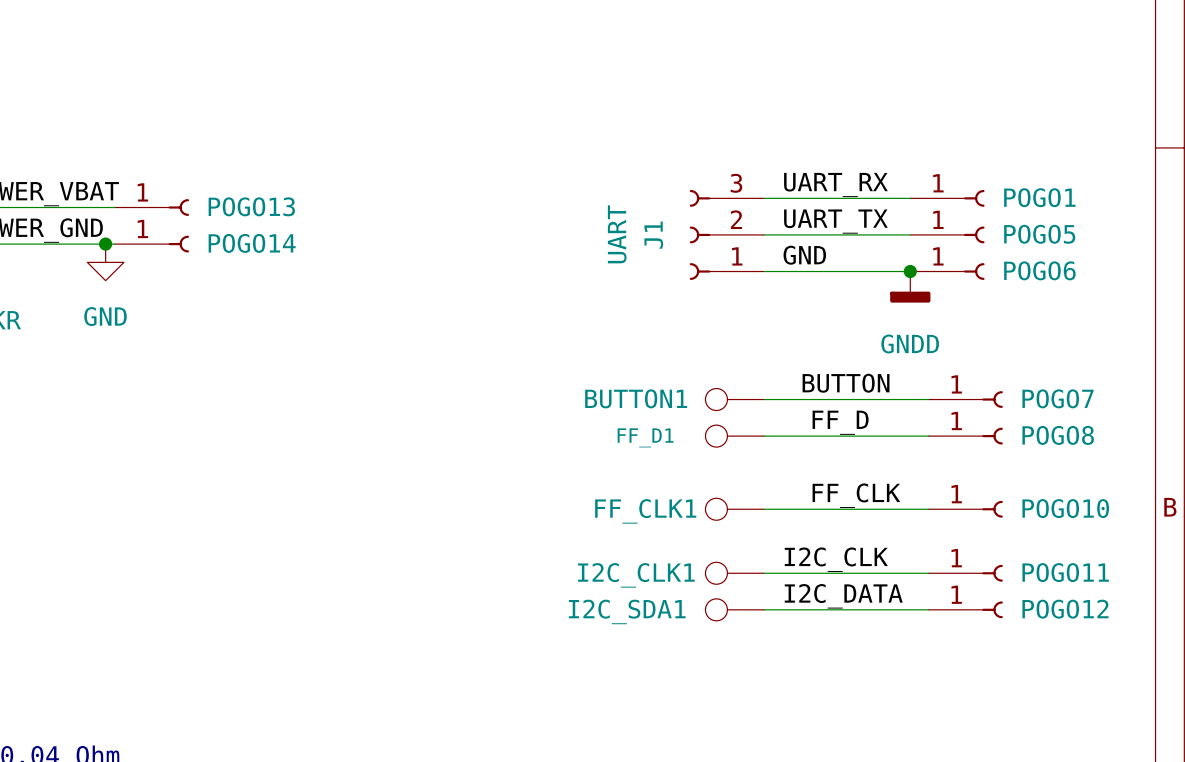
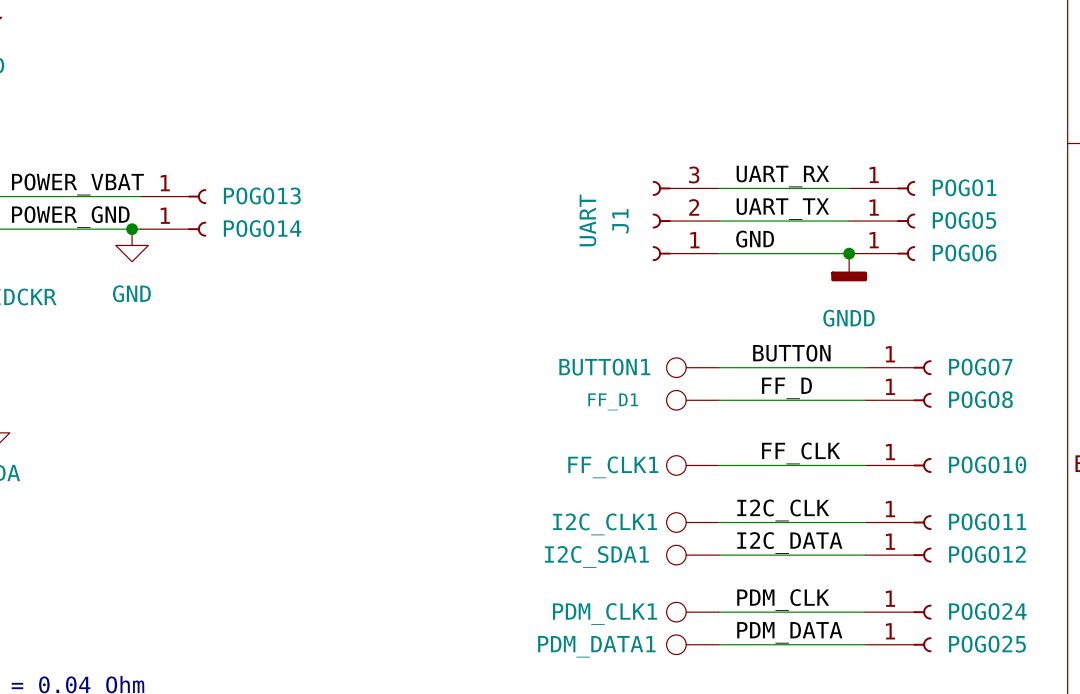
label: none -> PDM_CLK (783, 600)
PDM_CLK1: none -> (692, 612)
wire: none -> (718, 612) (865, 612)
POGO24: none -> (898, 612)
label: none -> PDM_DATA (789, 632)
PDM_DATA1: none -> (692, 644)
wire: none -> (718, 644) (865, 644)
POGO25: none -> (898, 644)

